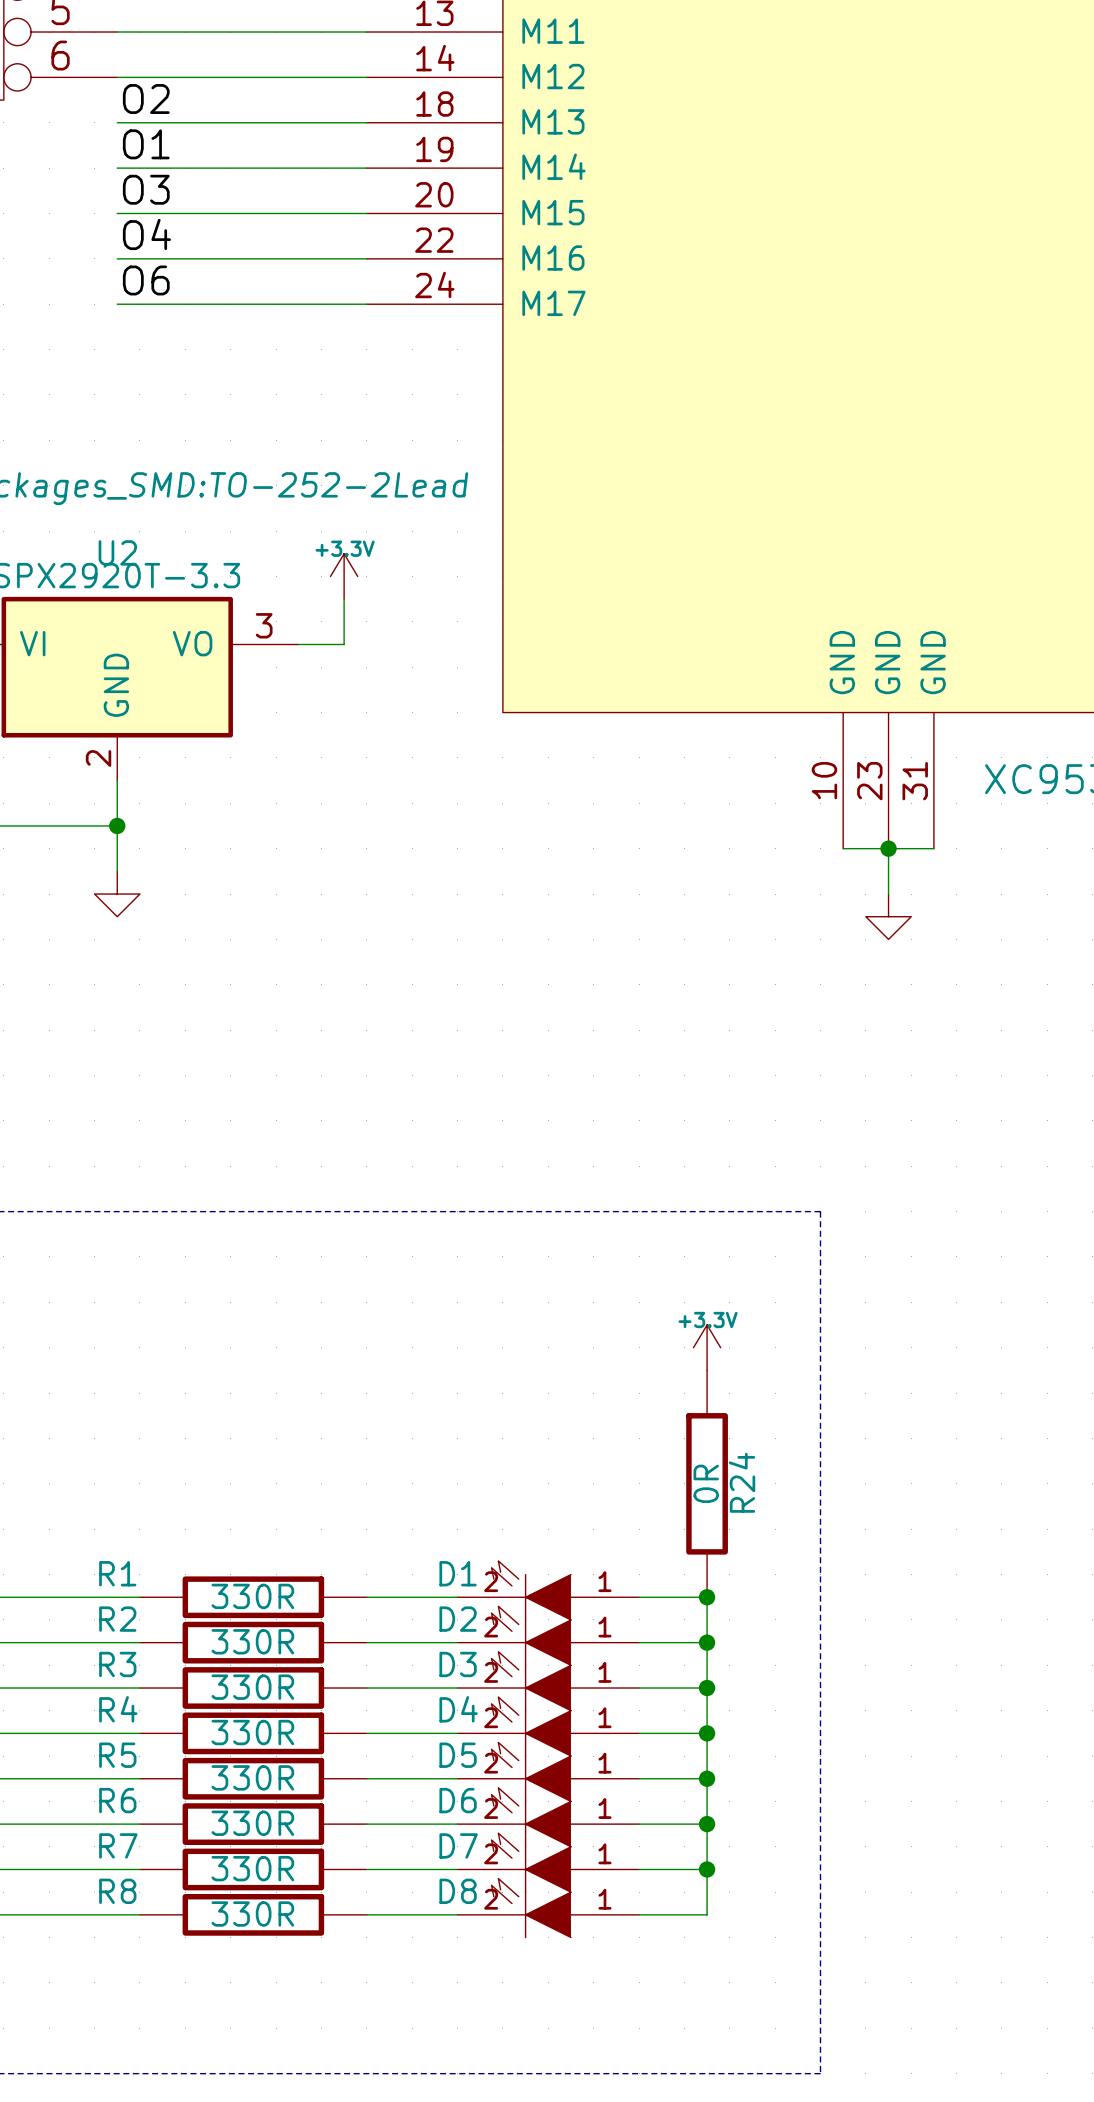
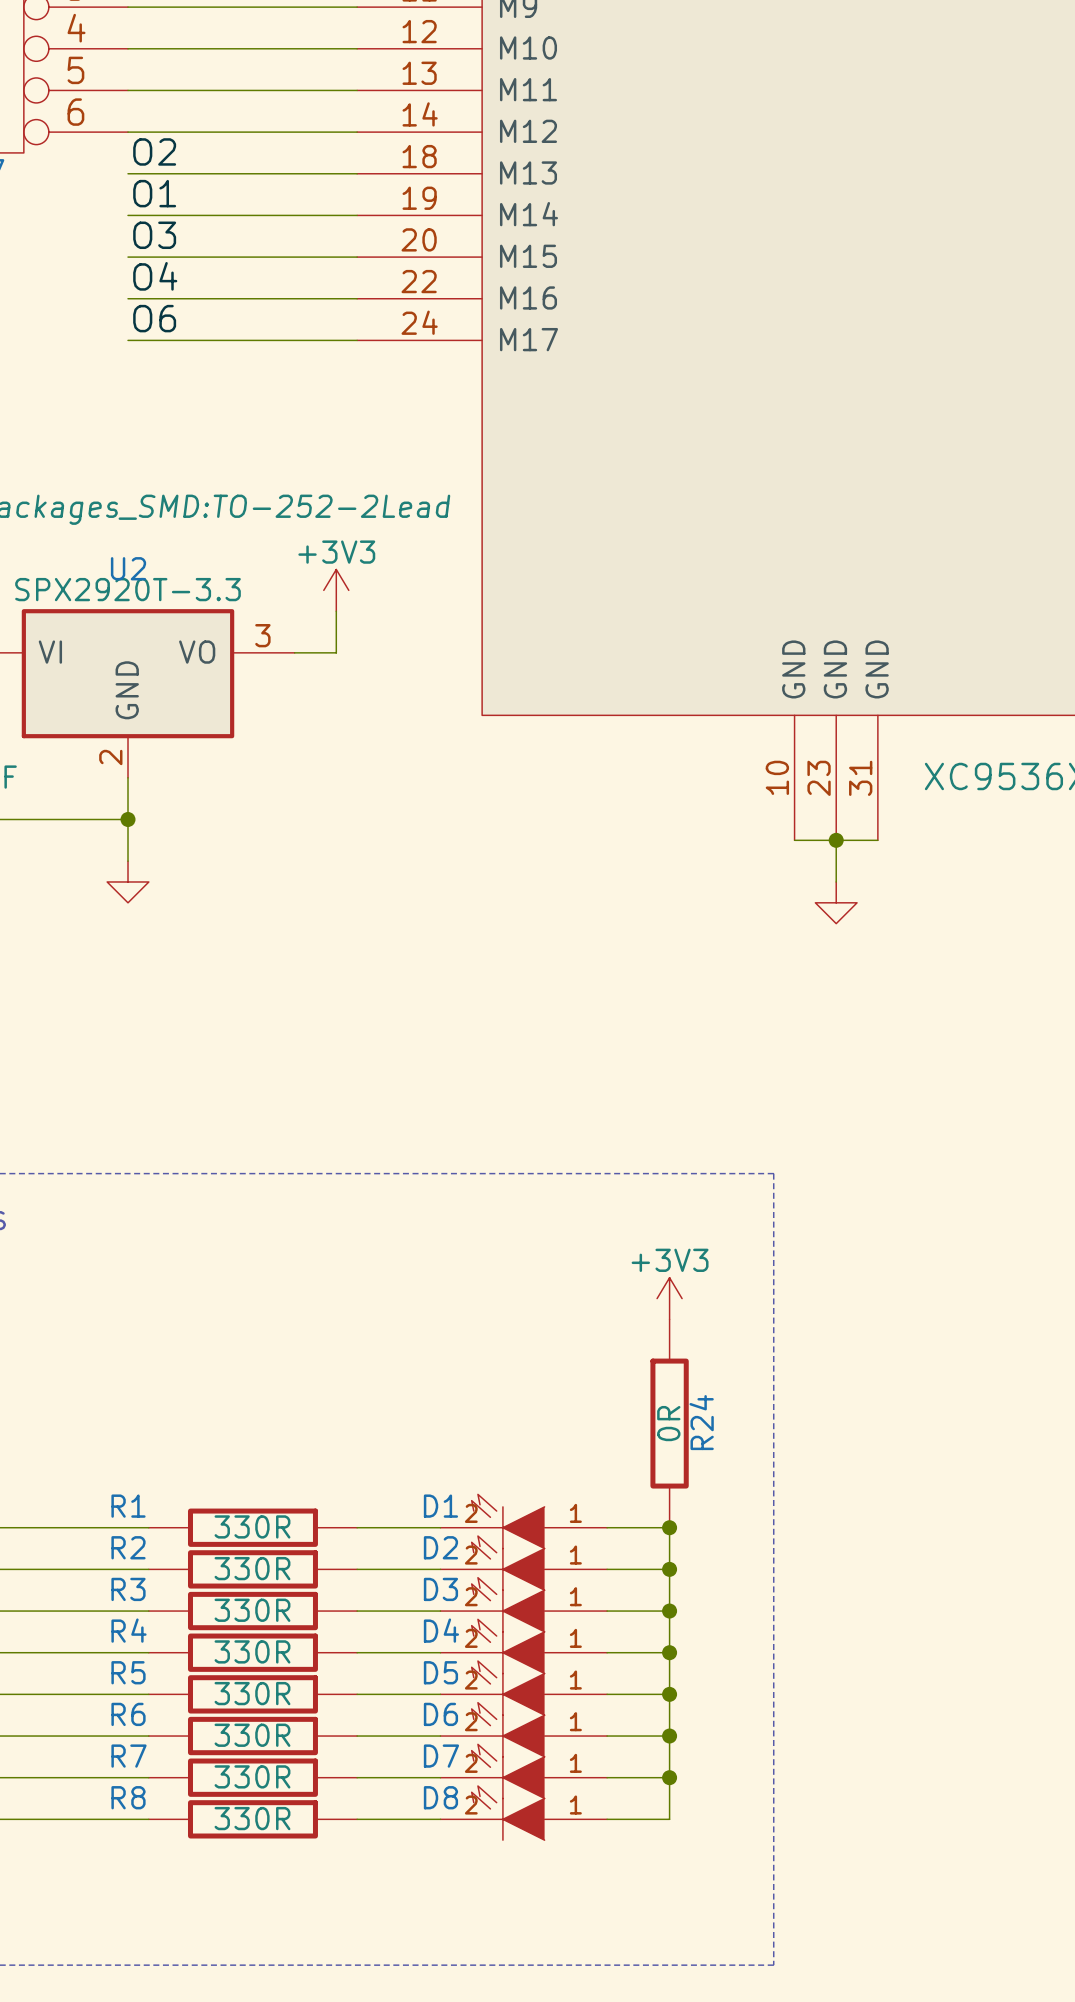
power symbol: +3.3V (344, 576) -> +3V3 (336, 590)
power symbol: +3.3V (707, 1347) -> +3V3 (669, 1298)

